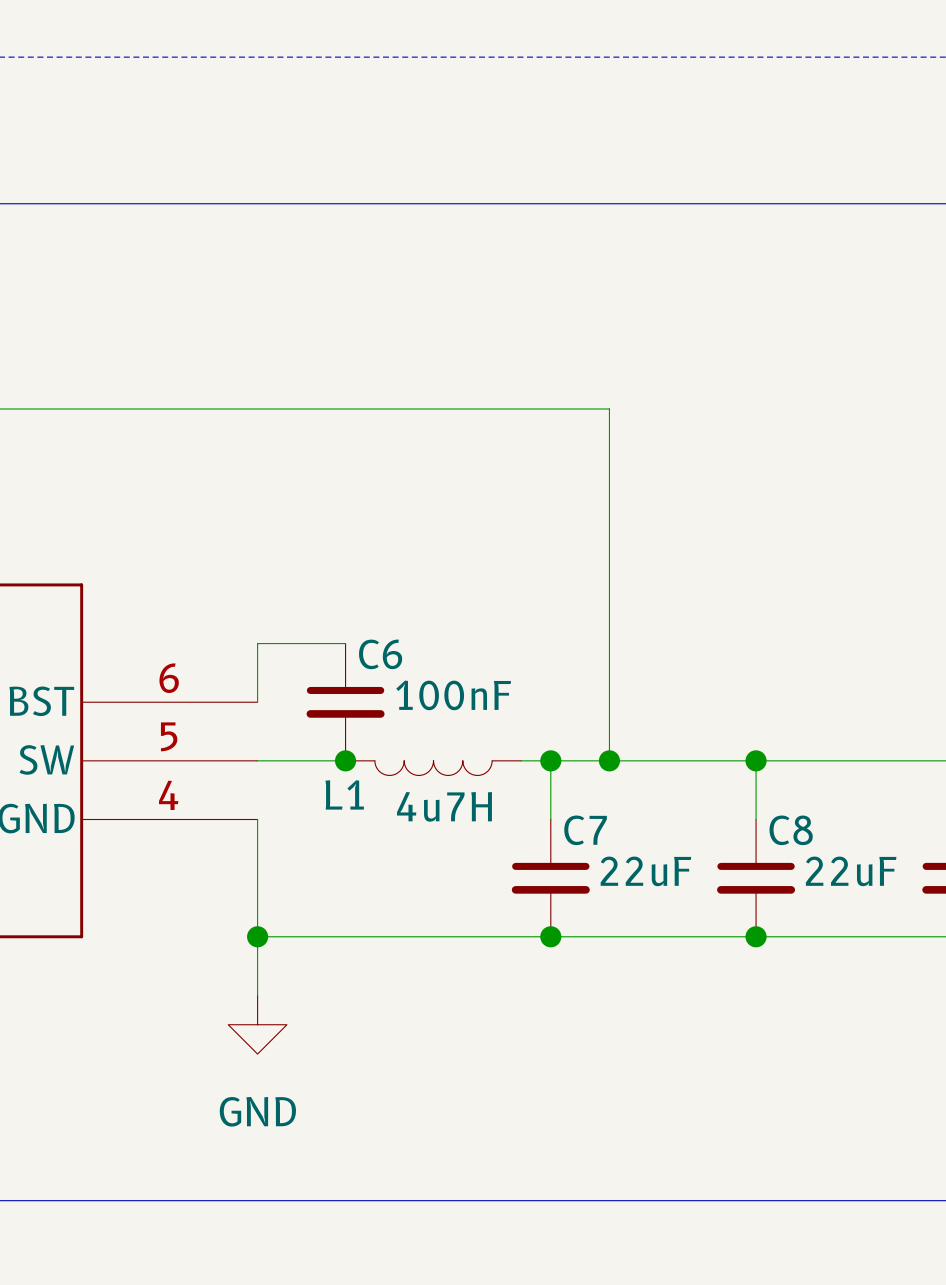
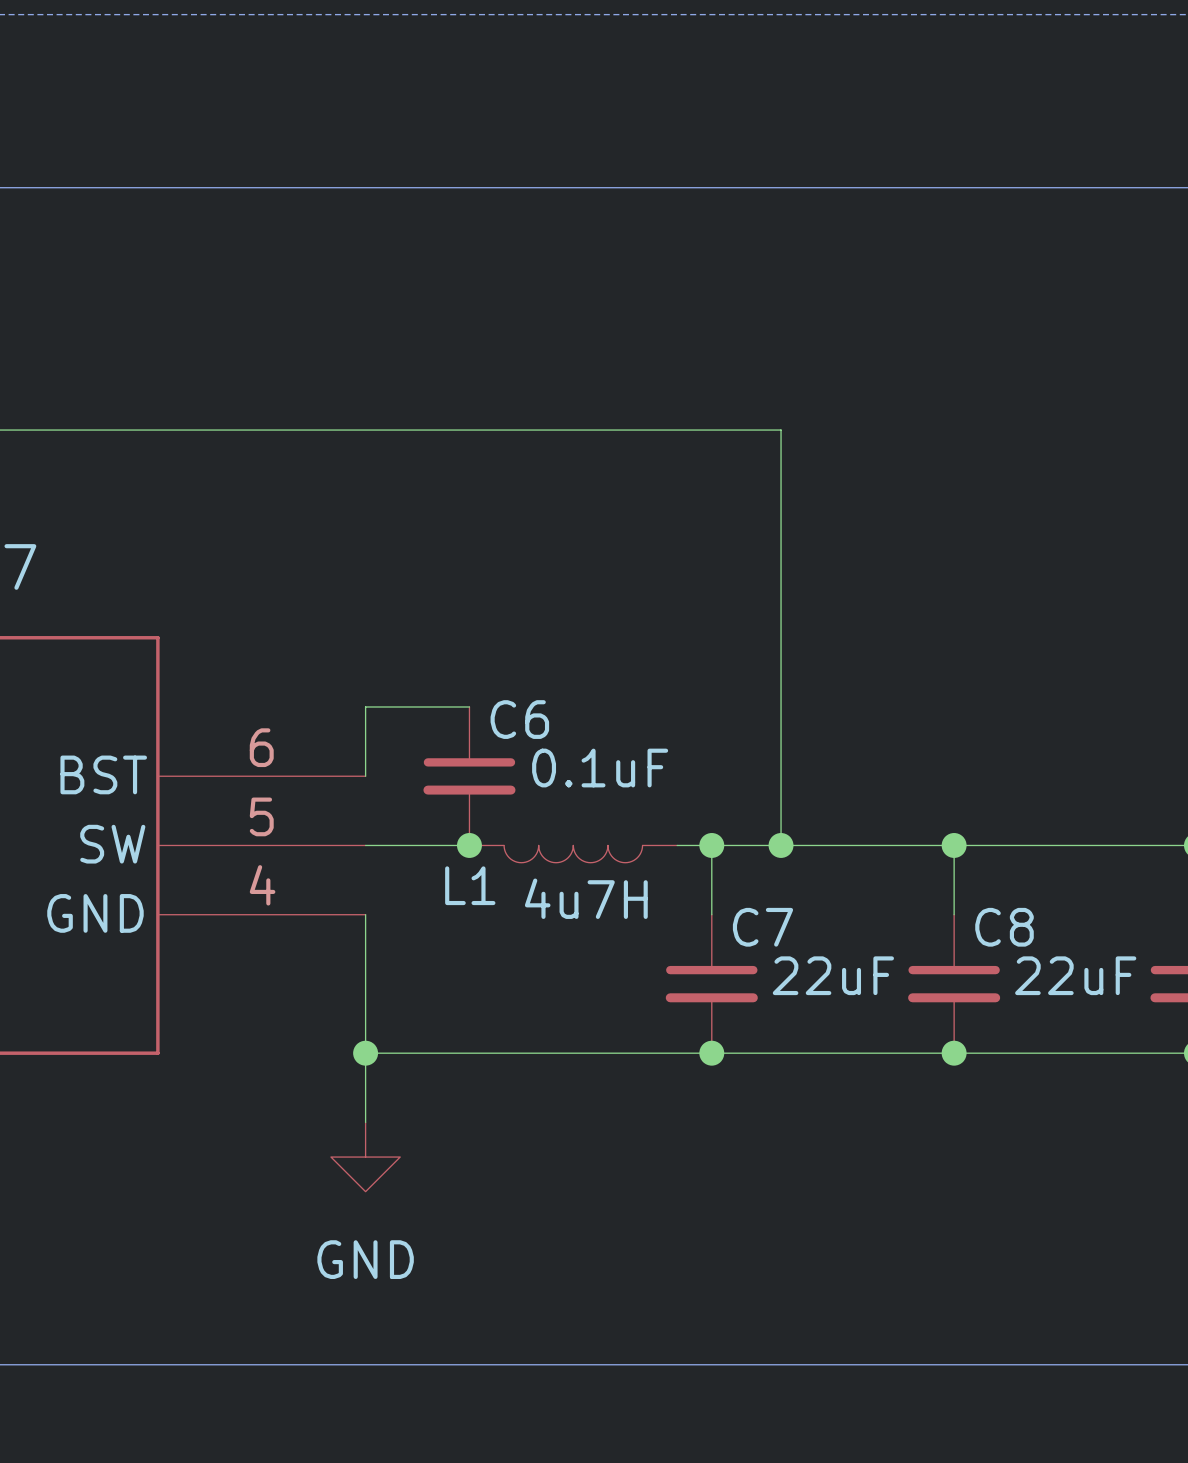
C6 value: 100nF (453, 695) -> 0.1uF (600, 768)

